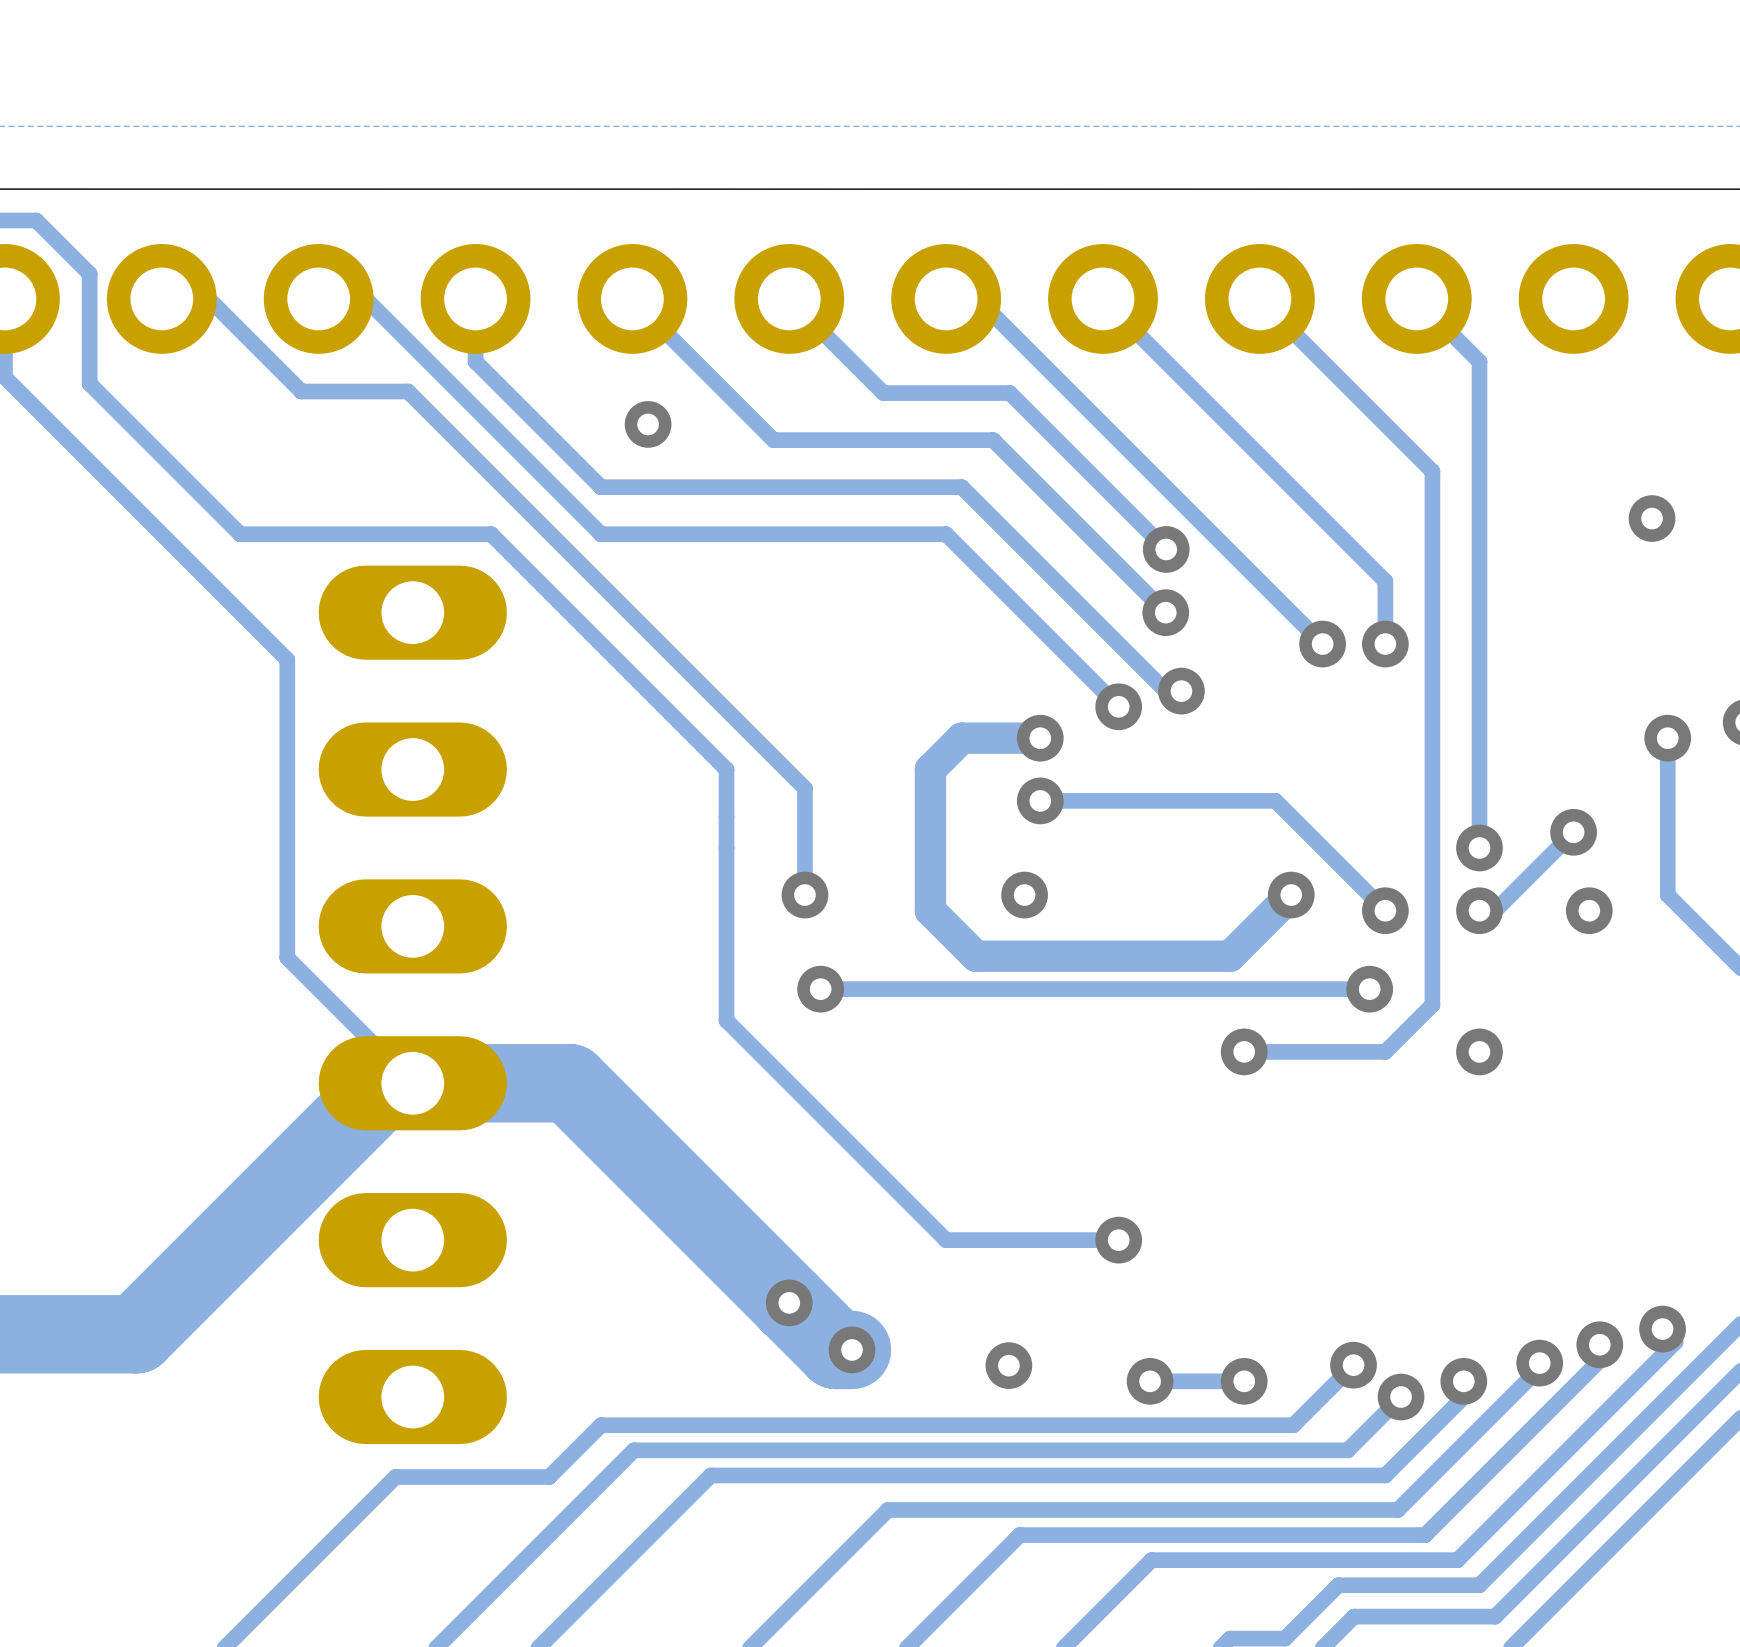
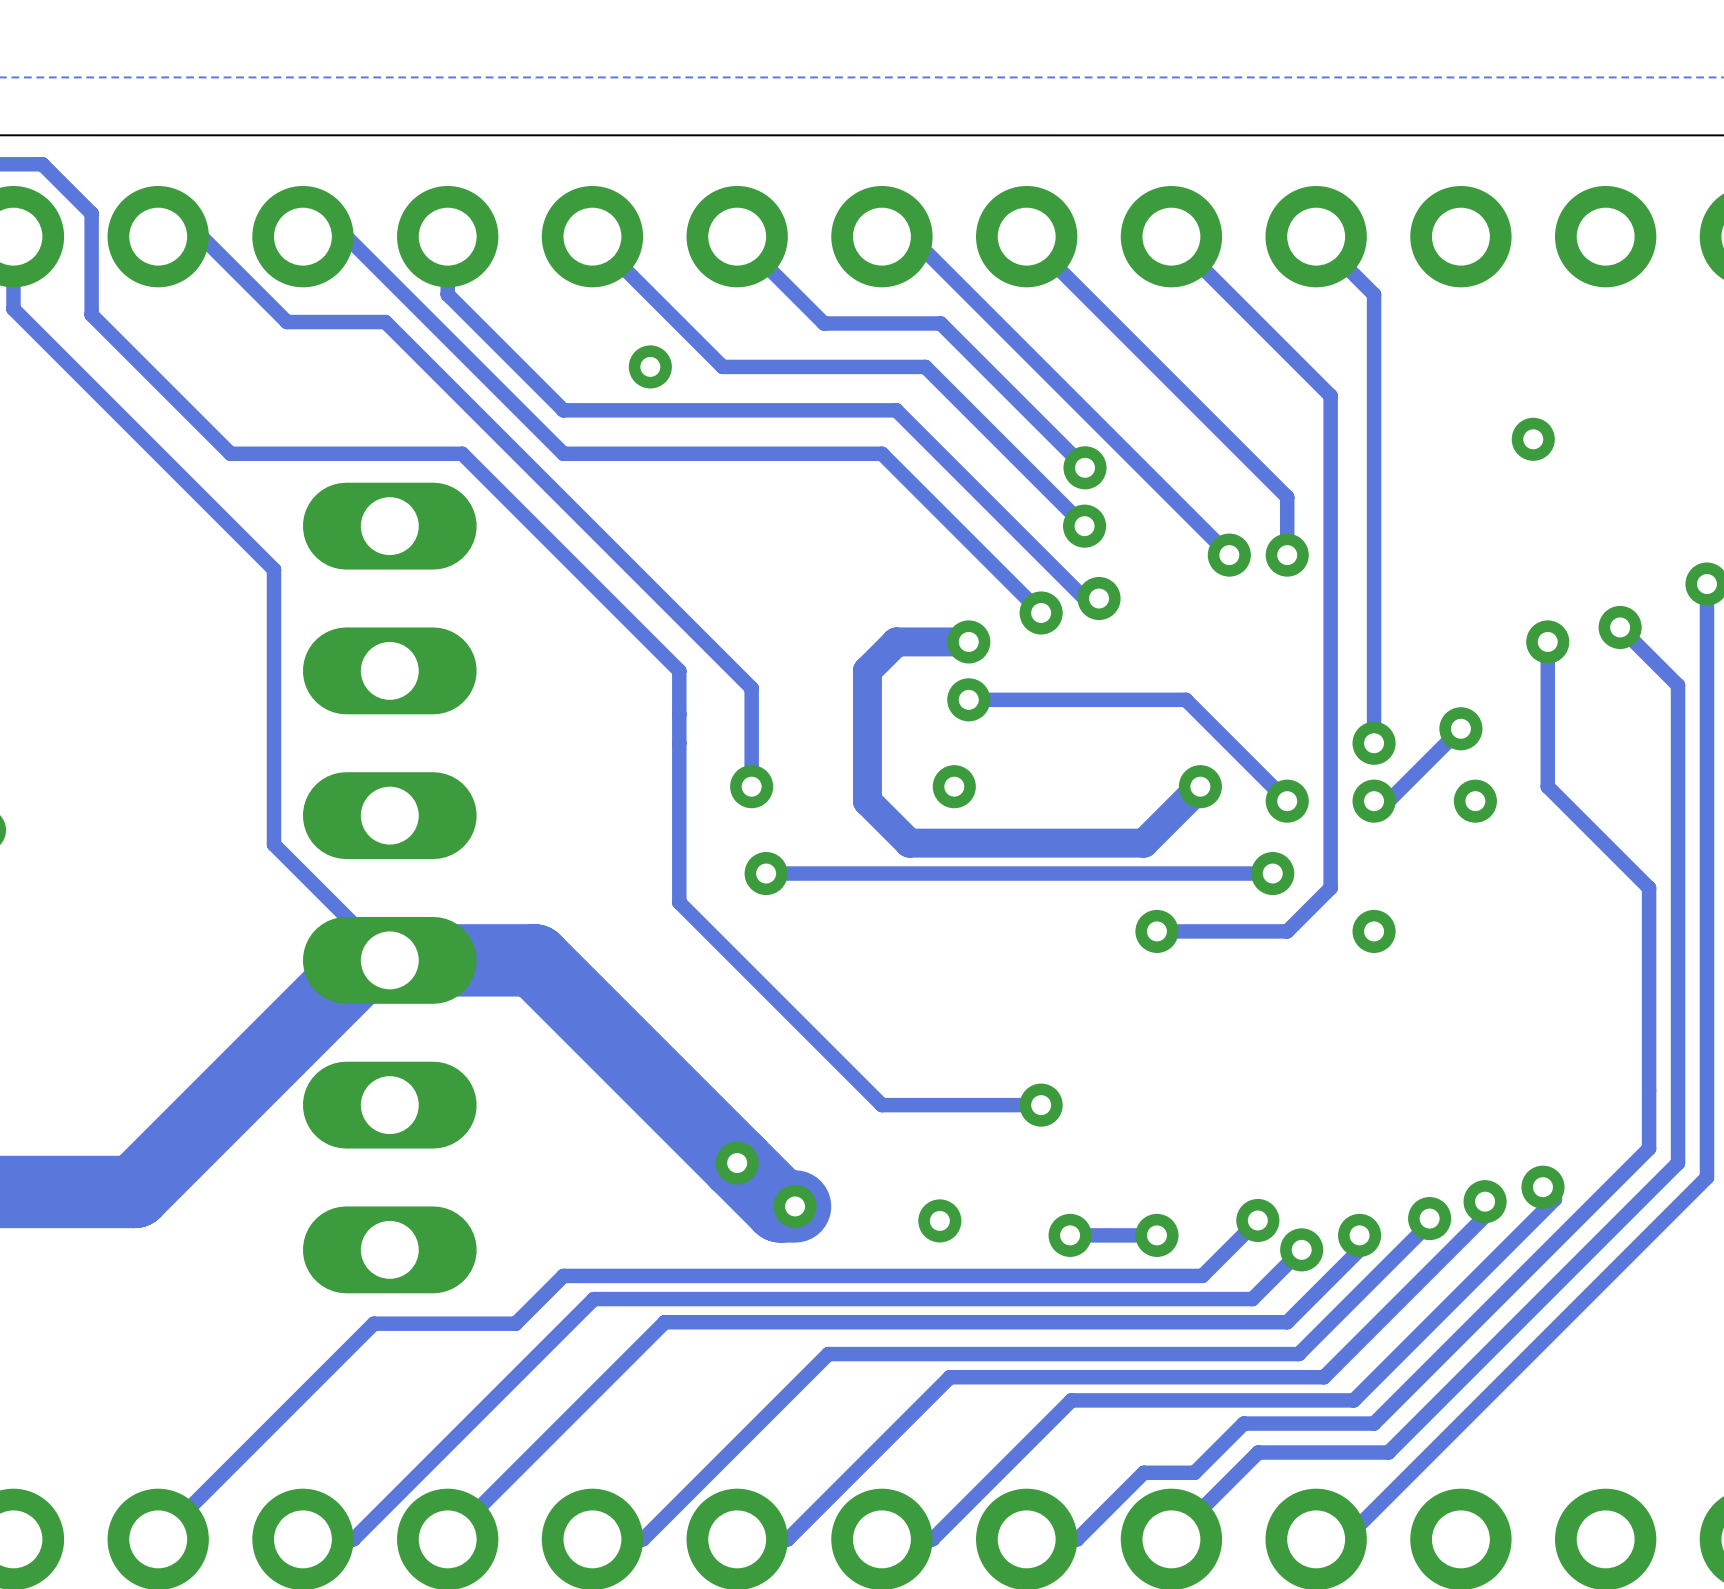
via position: (648, 424) -> (650, 366)

